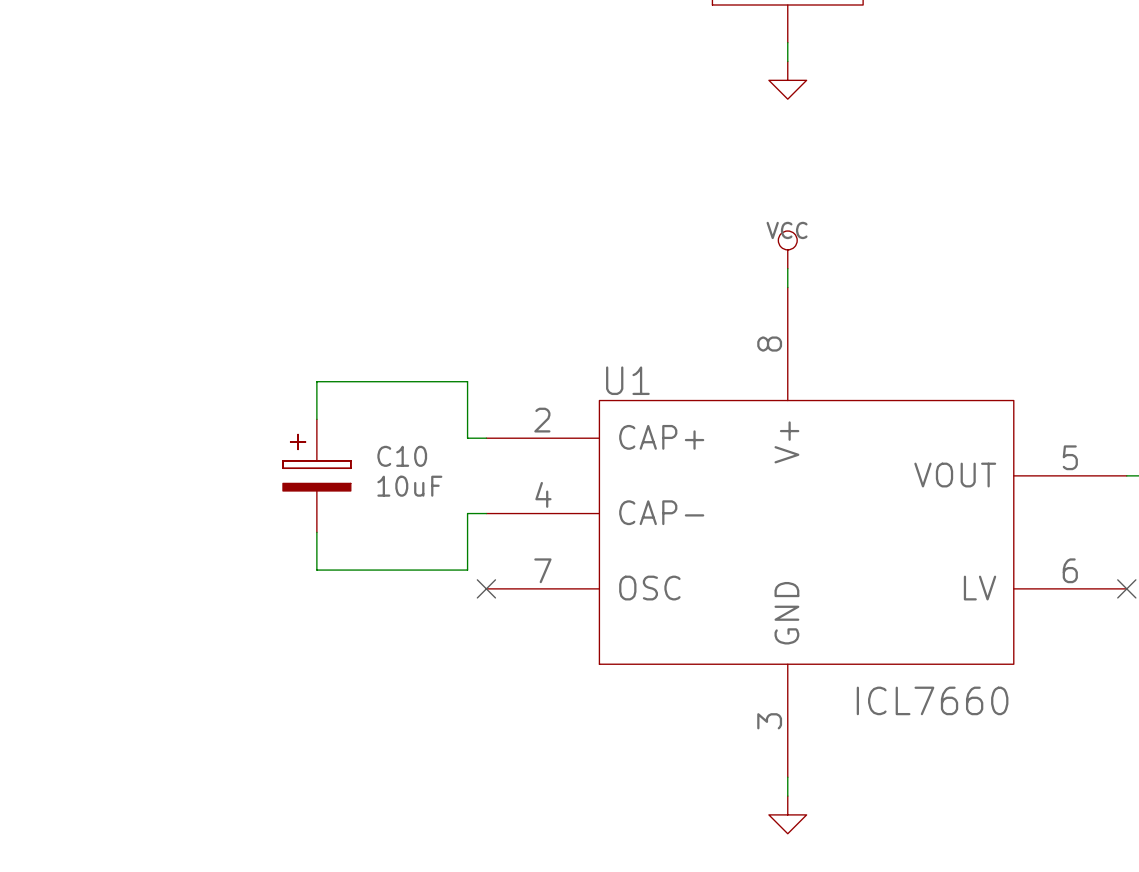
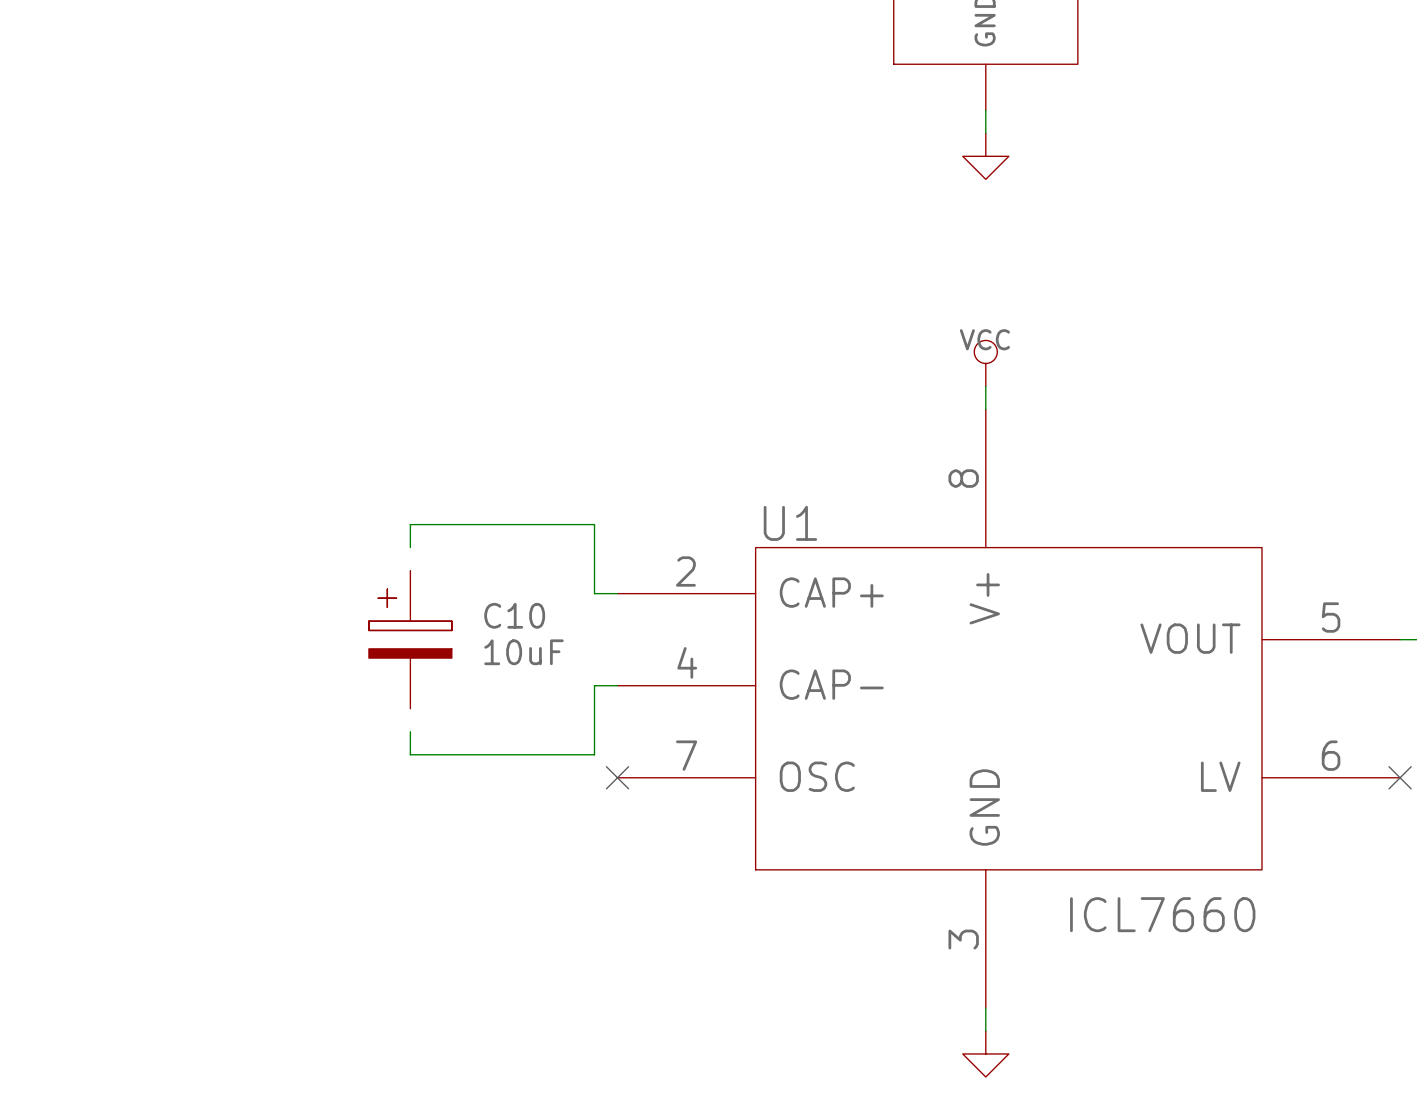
wire: (316, 400) (316, 419) -> none
wire: (316, 532) (316, 551) -> none

